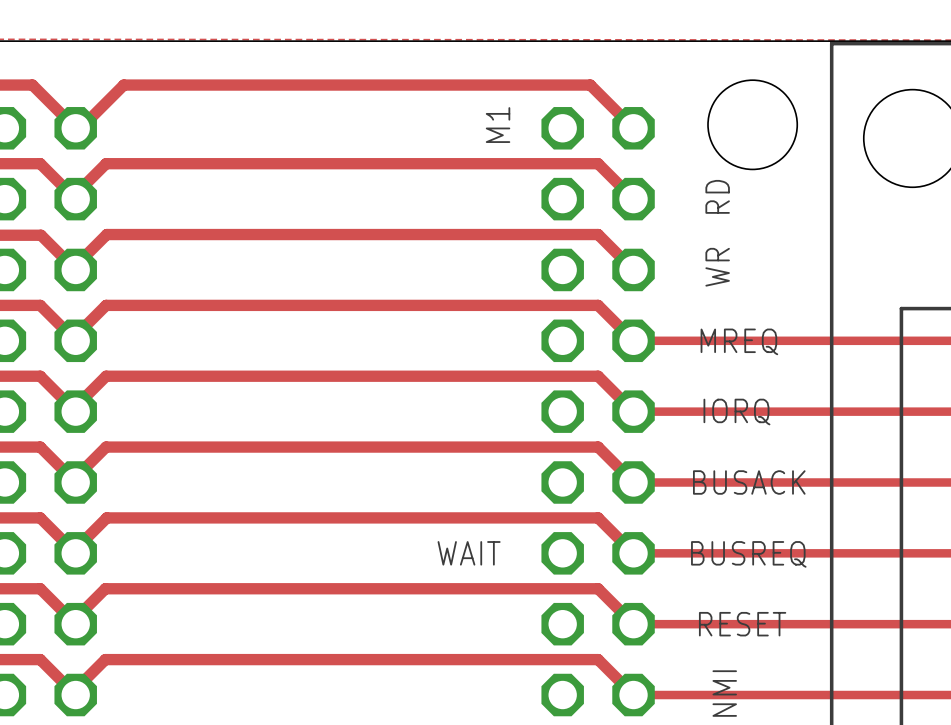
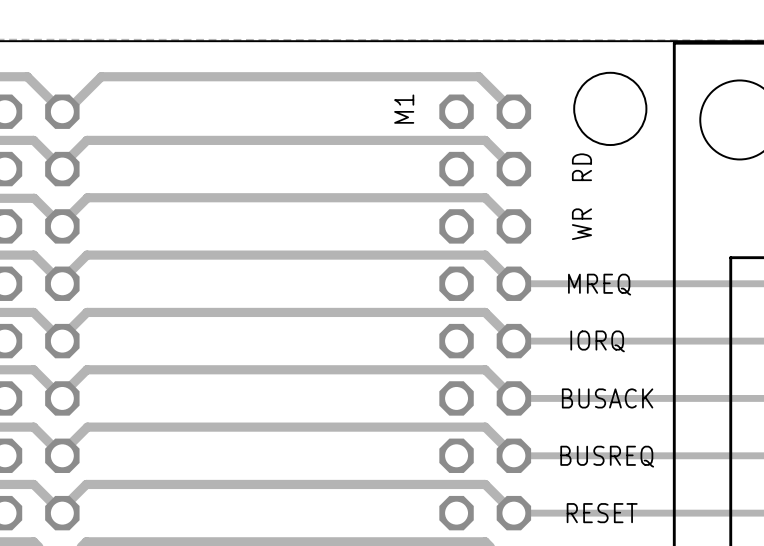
text: WAIT (469, 553) -> none

